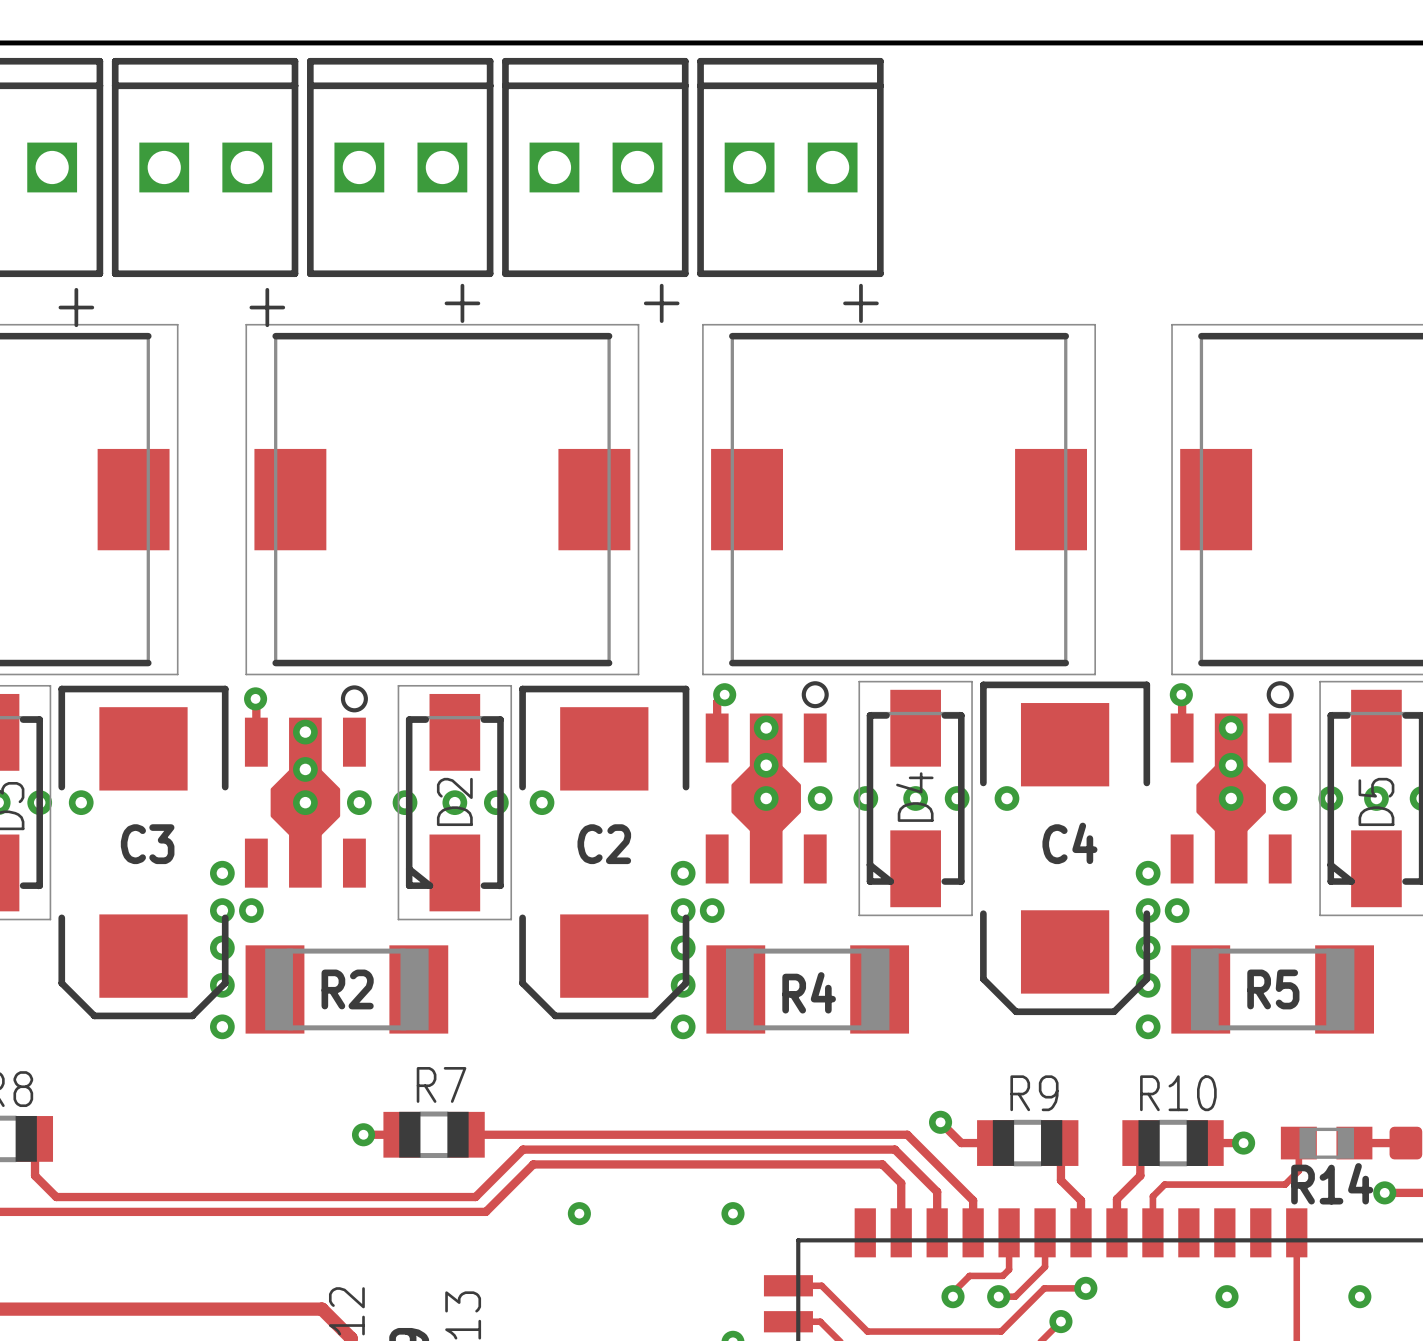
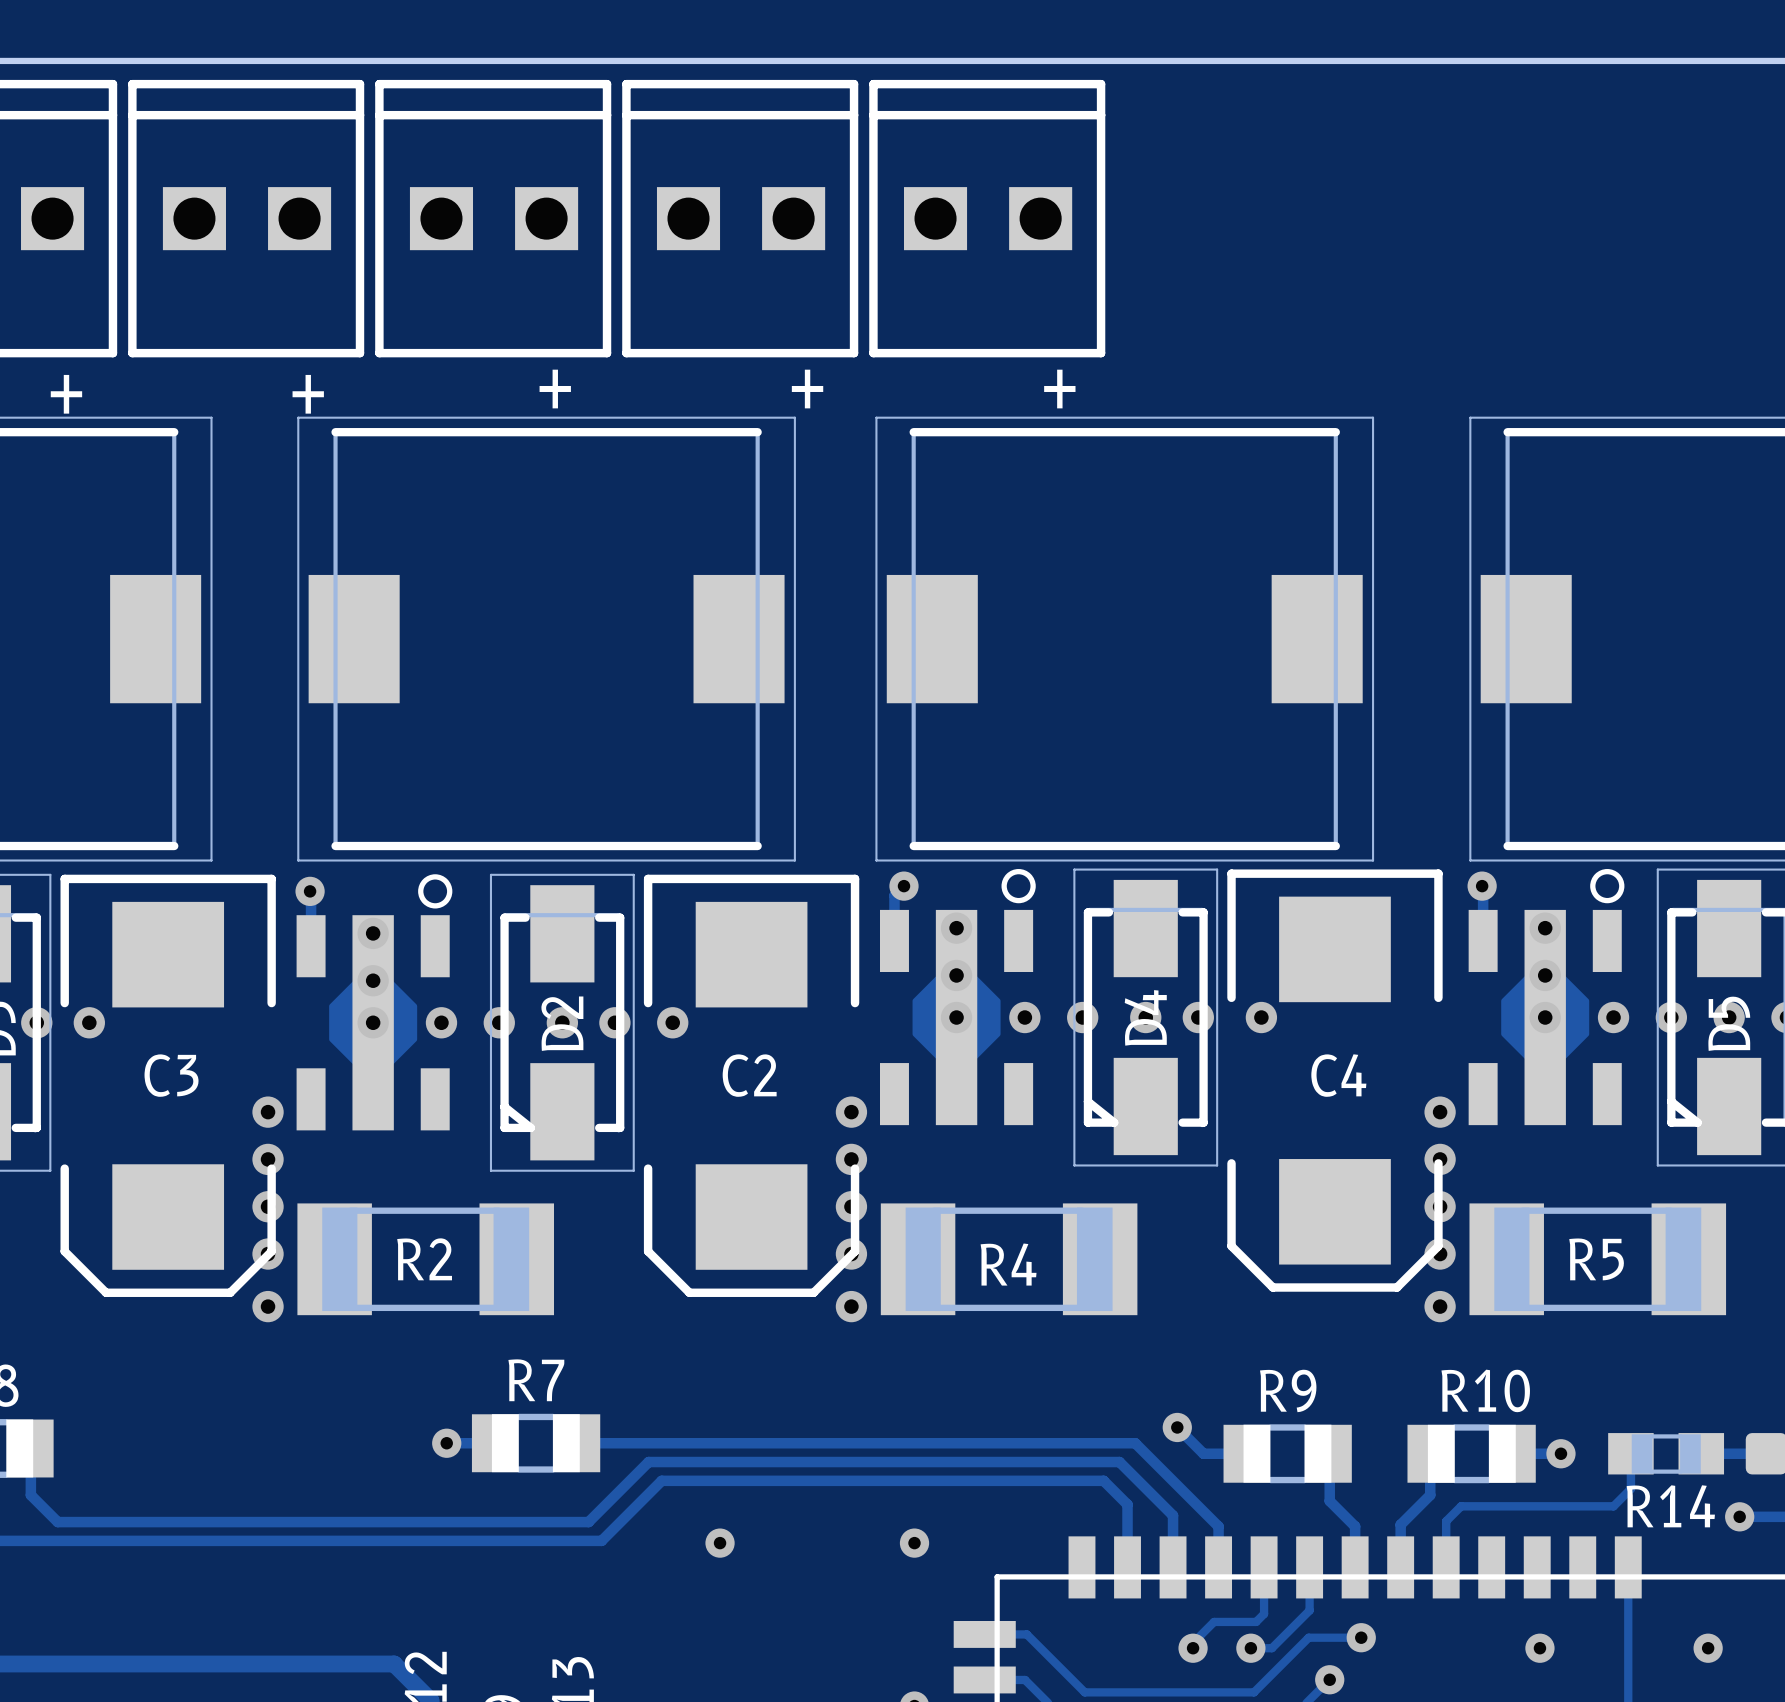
via: (251, 910) -> none
via: (712, 910) -> none
via: (1177, 910) -> none

